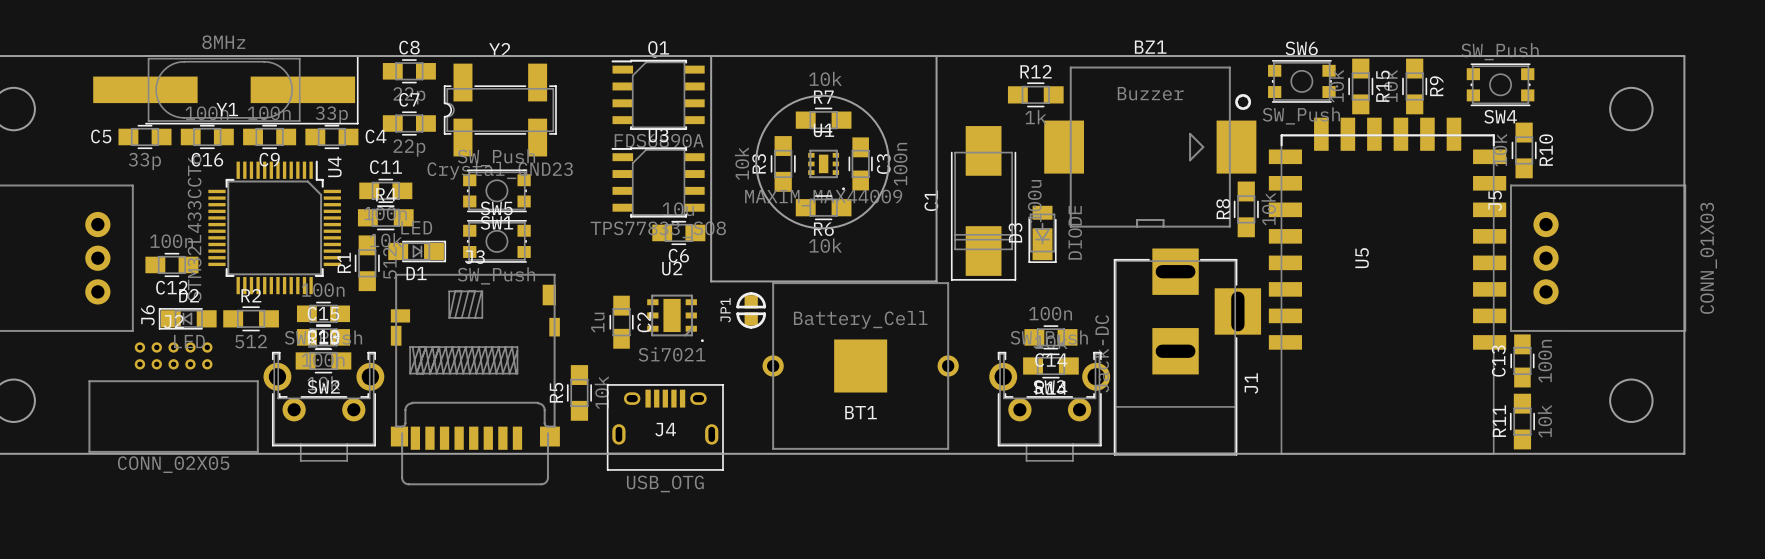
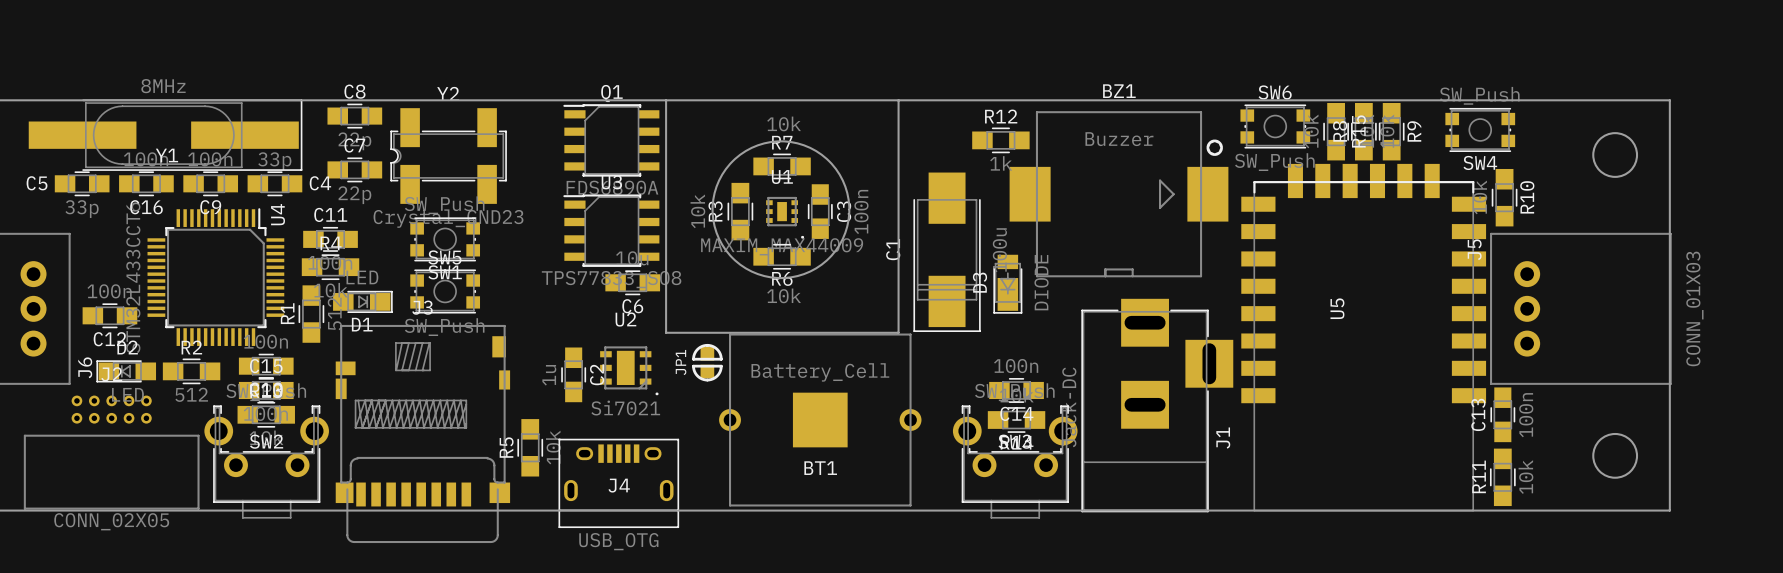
R8 position: (1246, 209) -> (1363, 131)

